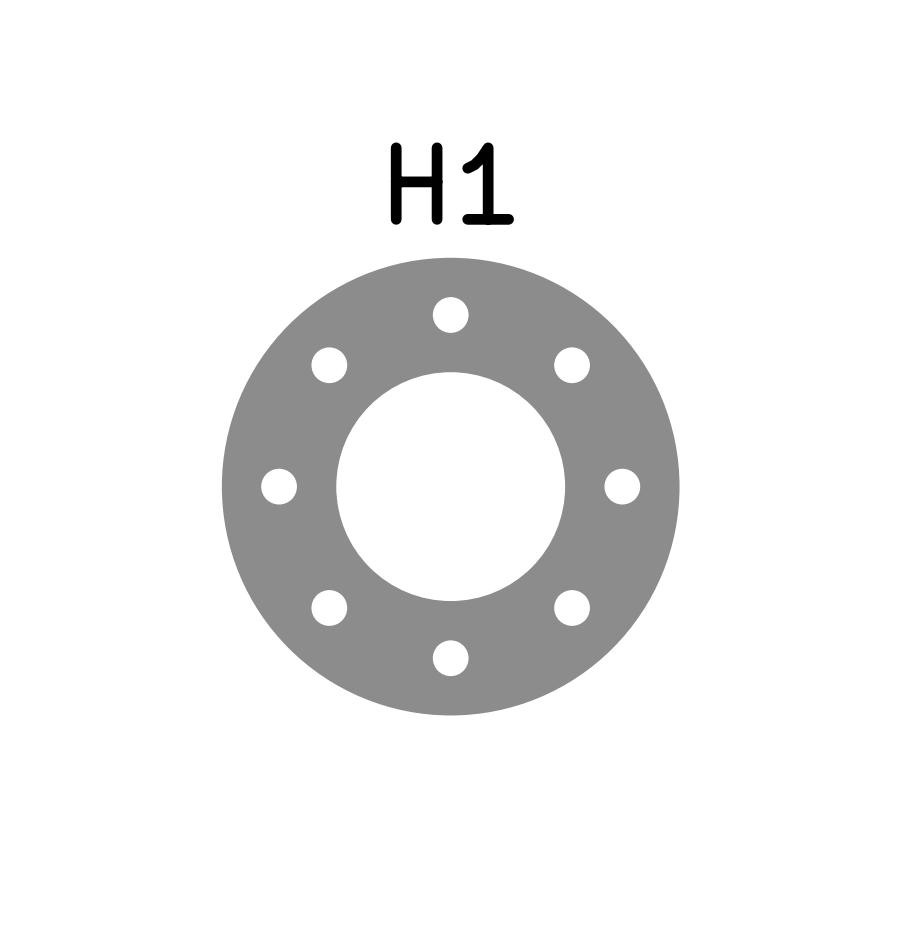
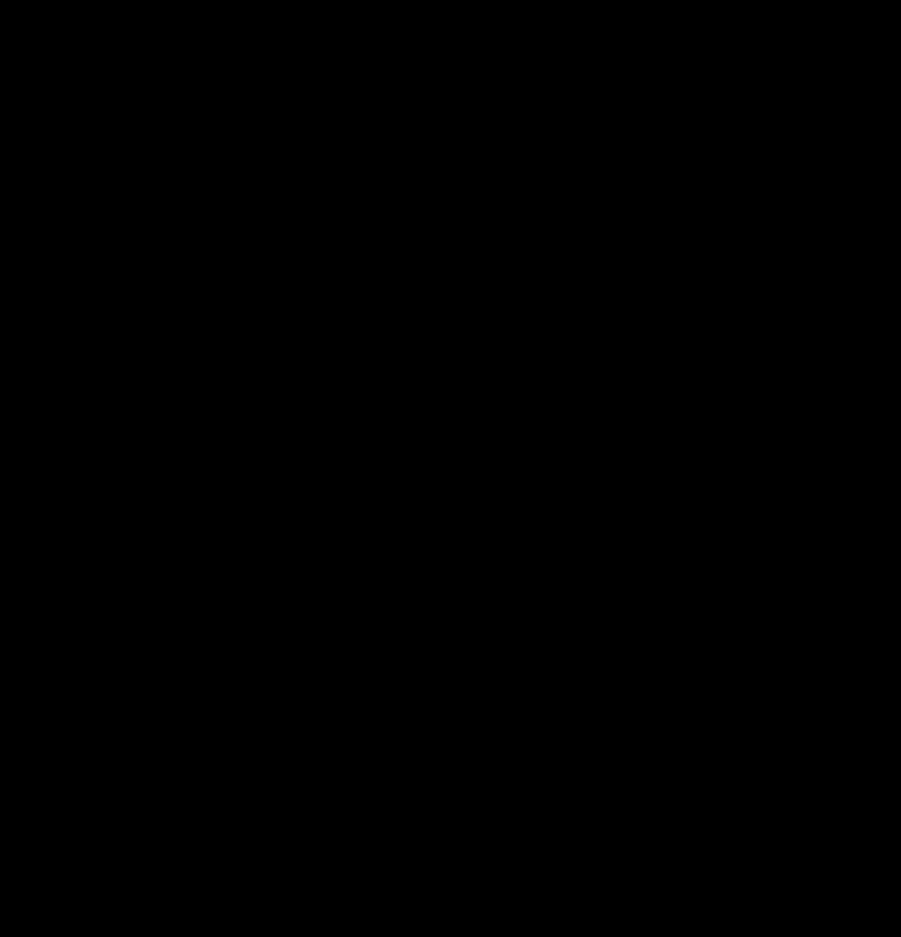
H1: (450, 486) -> none

